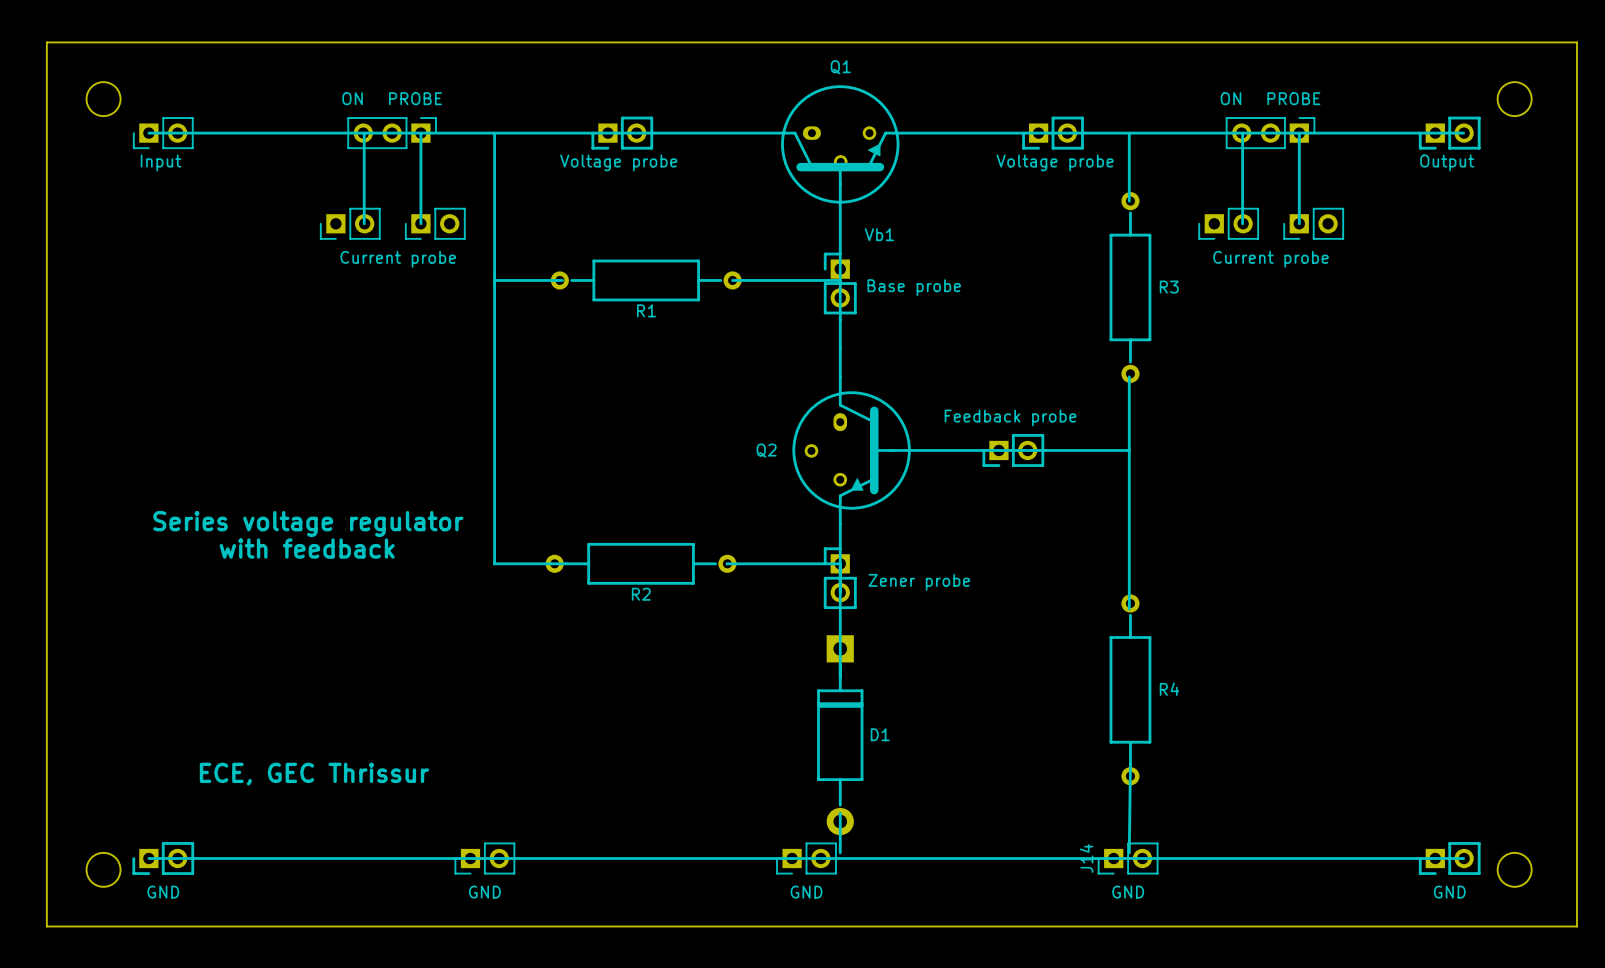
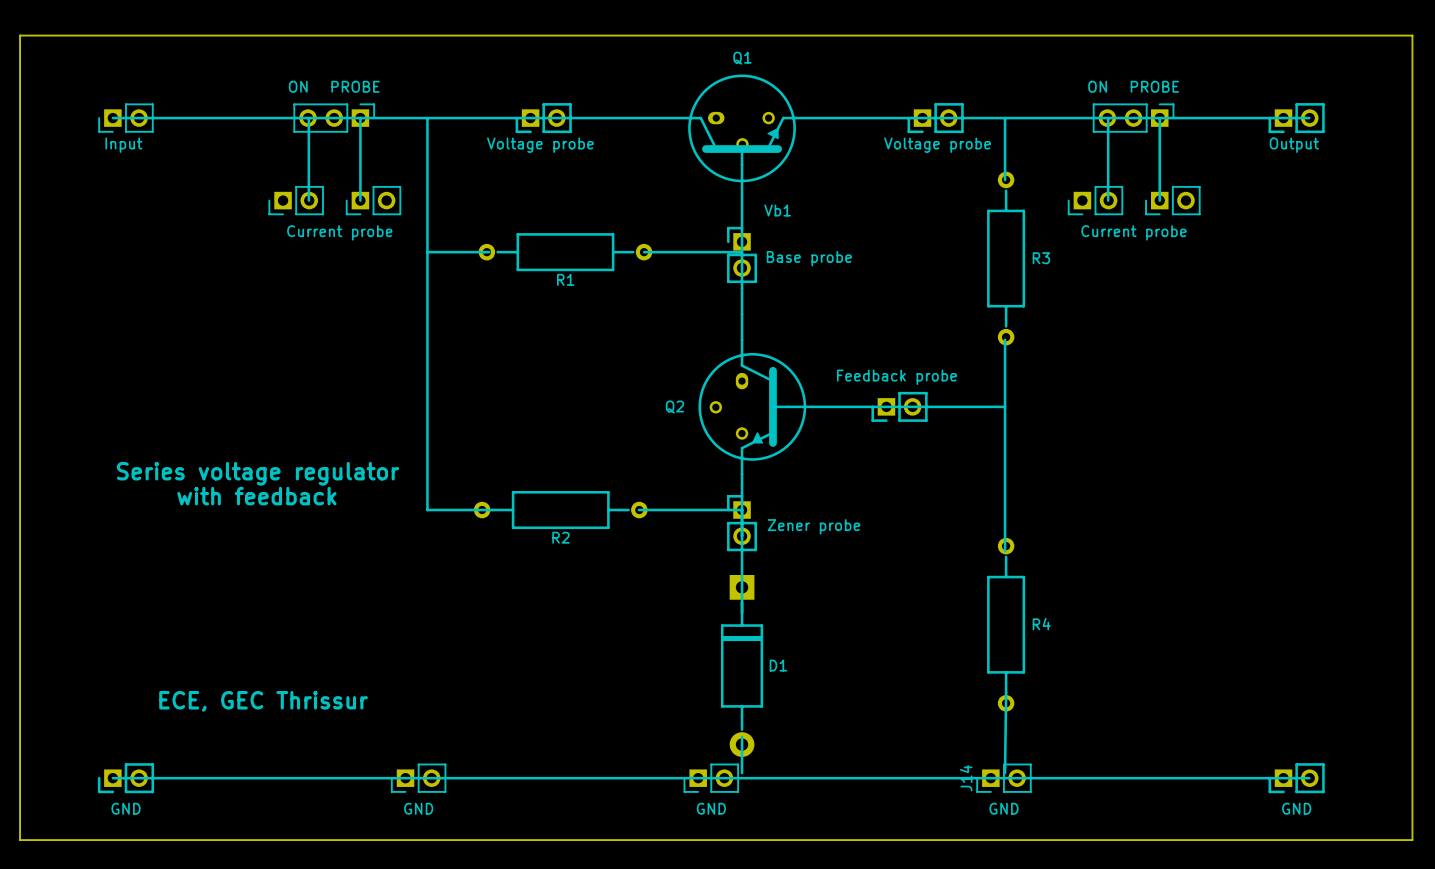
round board edge: [86, 81, 121, 117] -> none
round board edge: [1497, 81, 1532, 117] -> none
round board edge: [86, 852, 121, 888] -> none
round board edge: [1497, 852, 1532, 888] -> none

